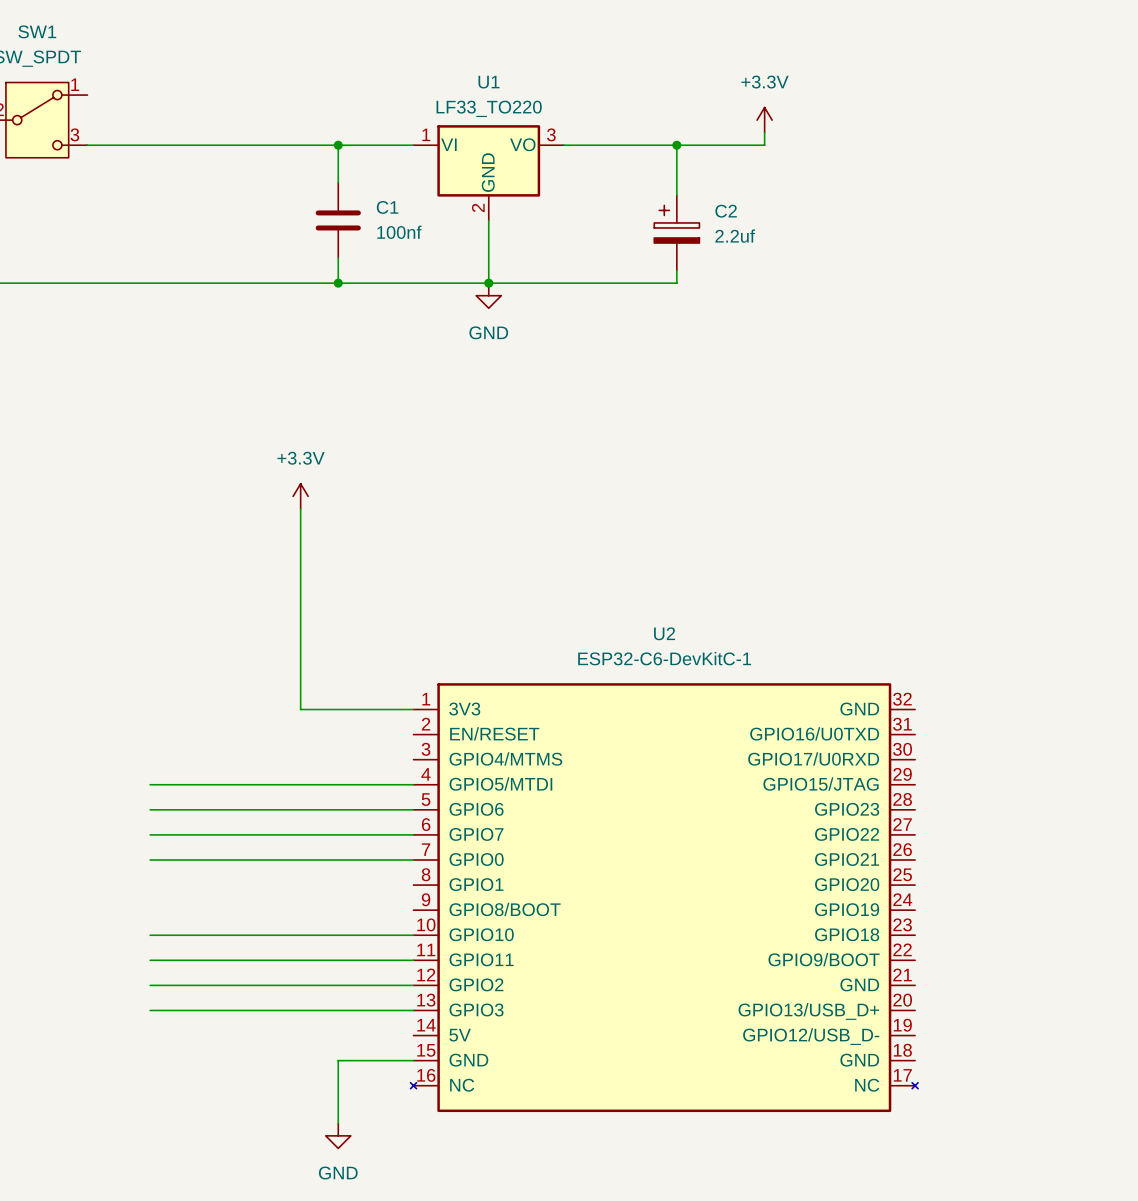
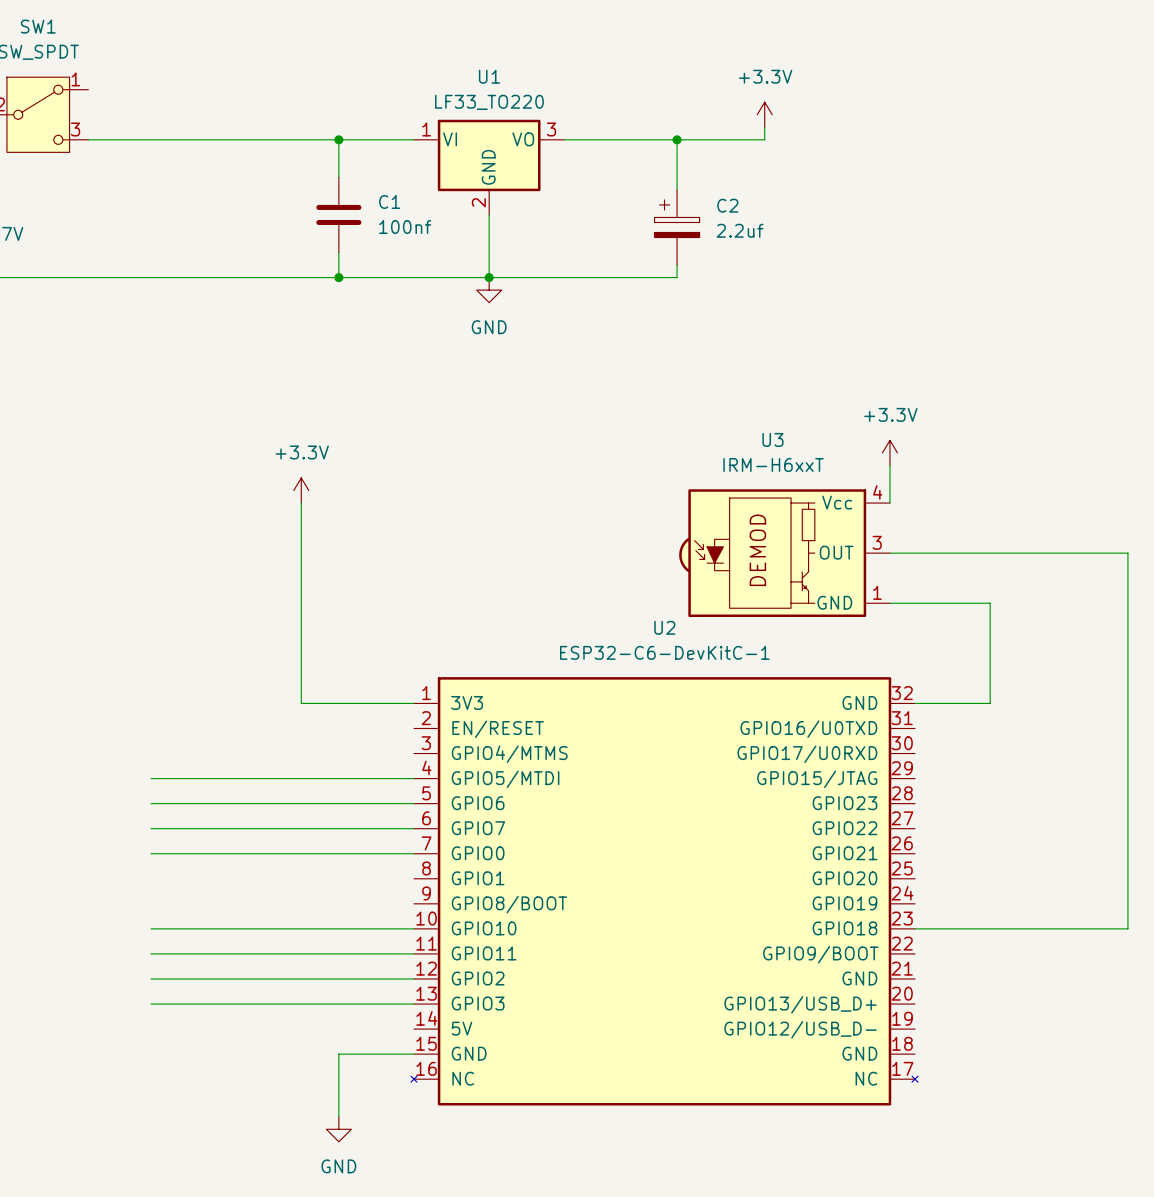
power symbol: none -> +3.3V (889, 452)
wire: none -> (889, 465) (889, 503)
U3: none -> IRM-H6xxT (784, 553)
wire: none -> (889, 553) (1127, 553) (1127, 928) (915, 928)
wire: none -> (889, 603) (990, 603) (990, 703) (915, 703)

